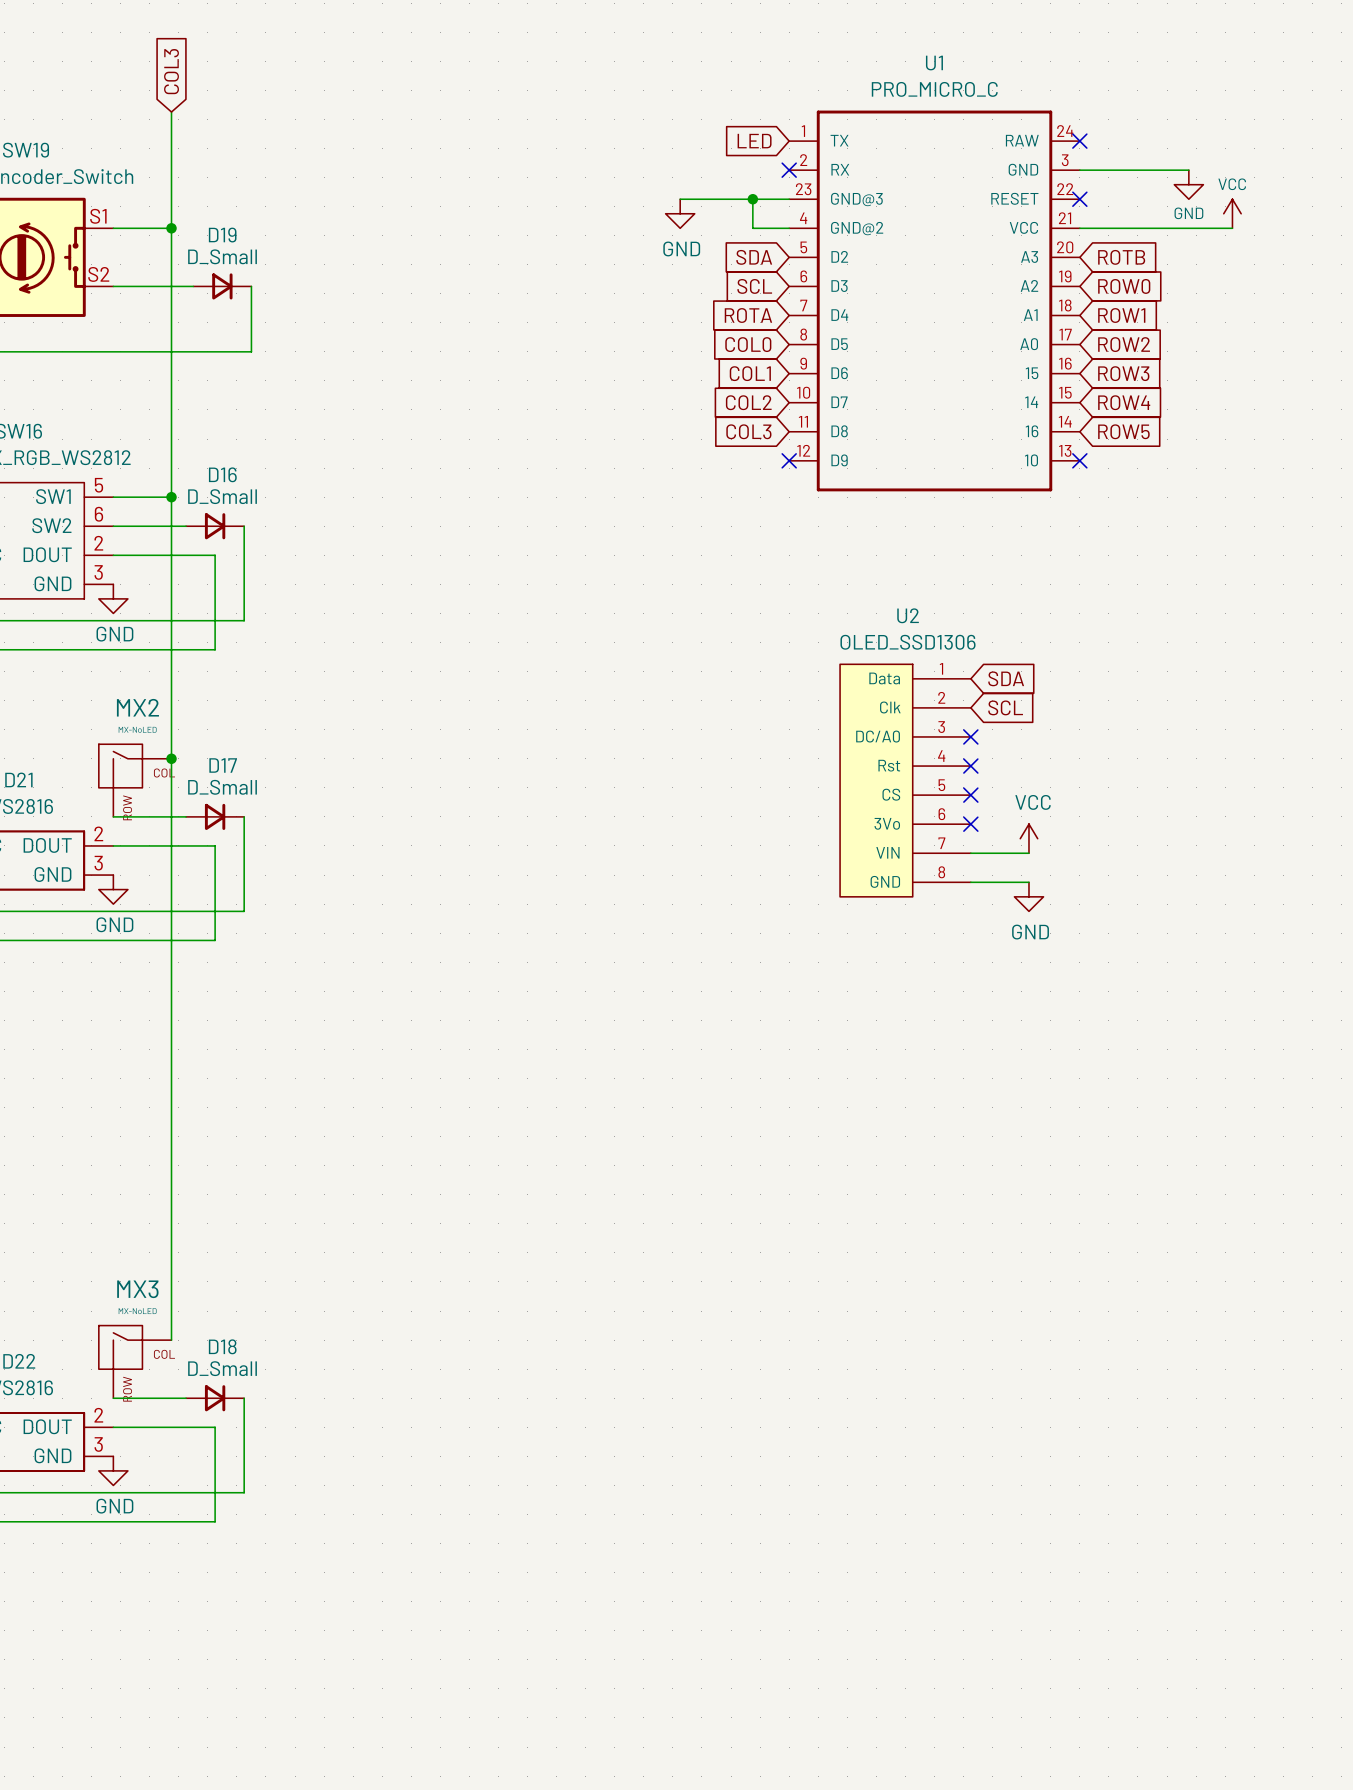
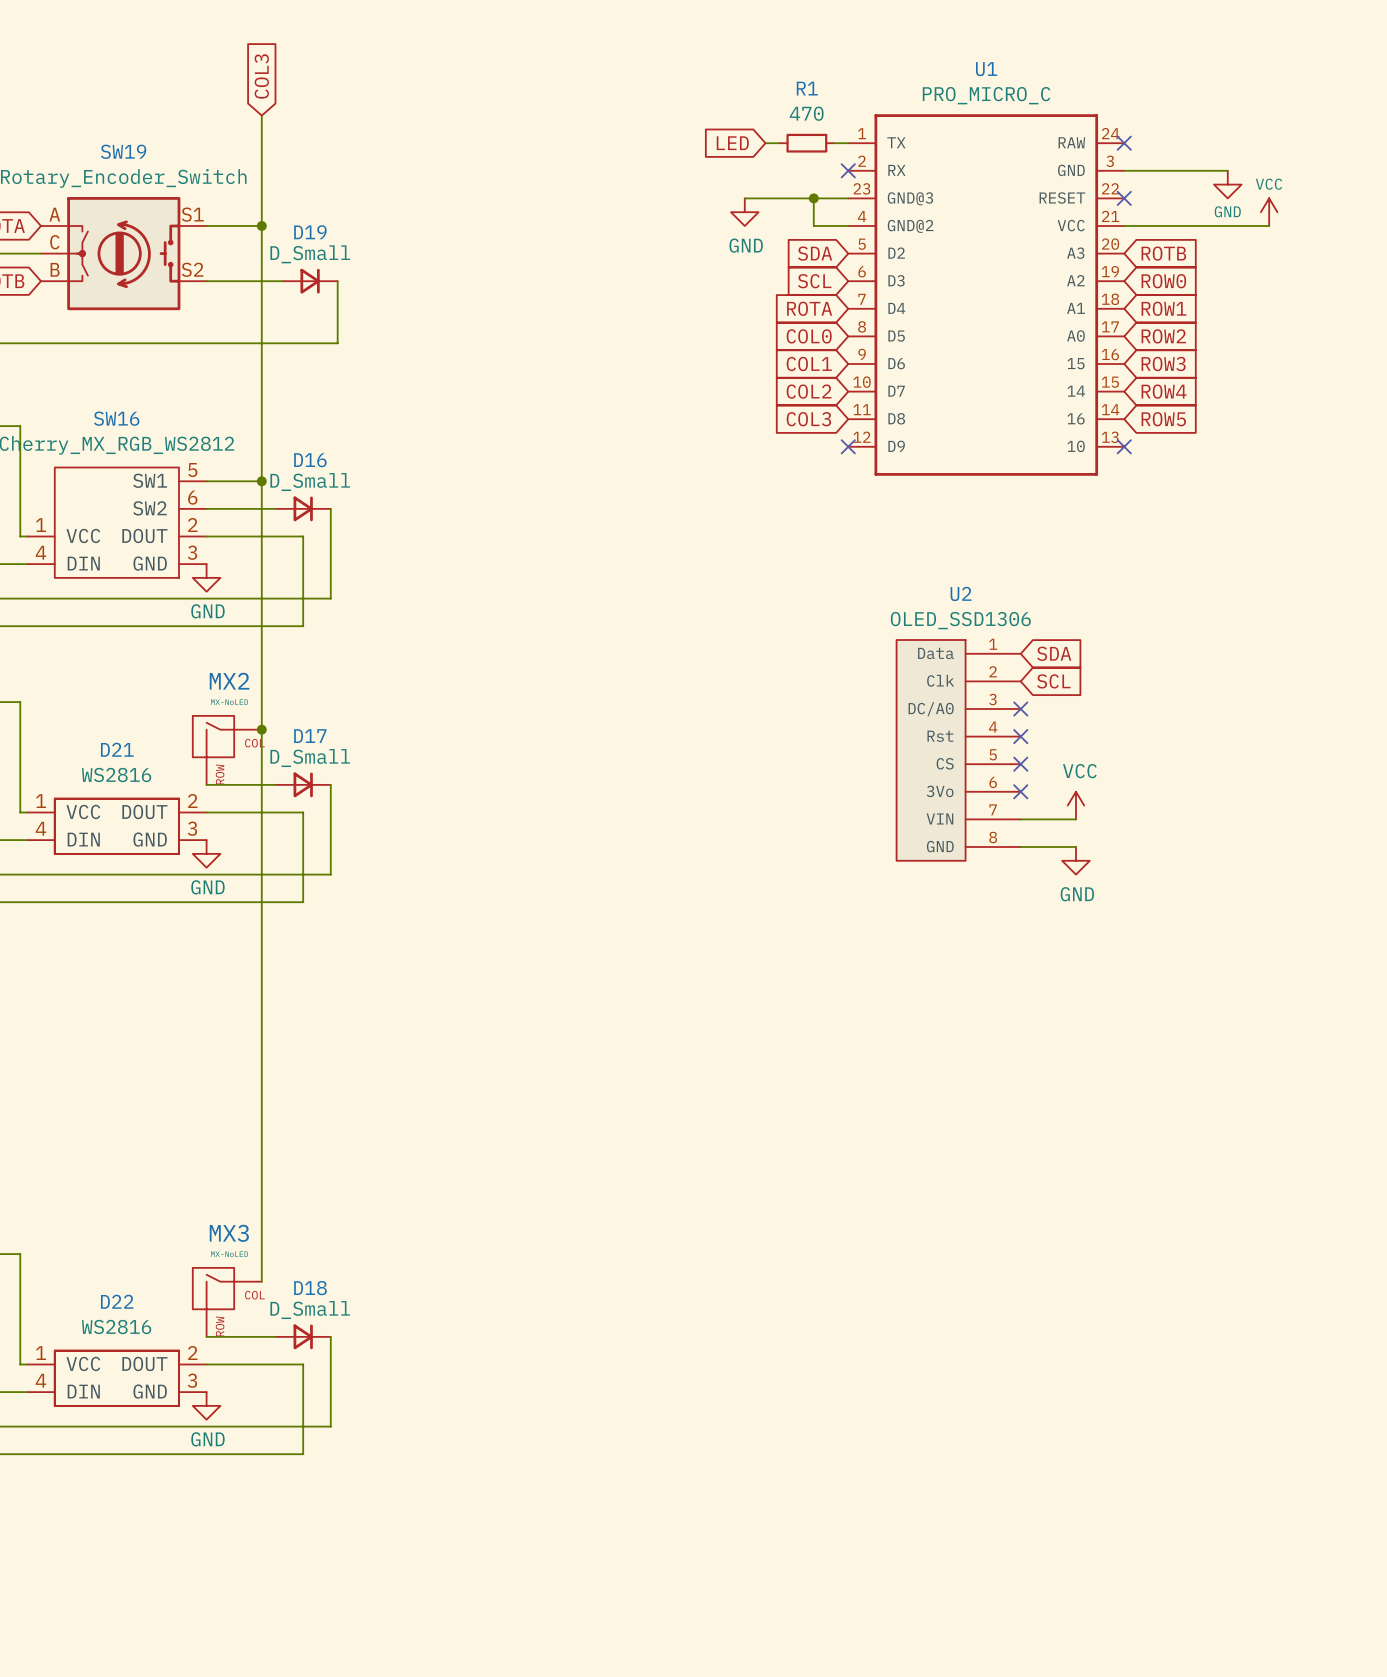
wire: none -> (765, 143) (779, 143)
R1: none -> 470 (806, 143)
global label position: LED (754, 141) -> LED (732, 143)
wire: none -> (834, 143) (848, 143)

